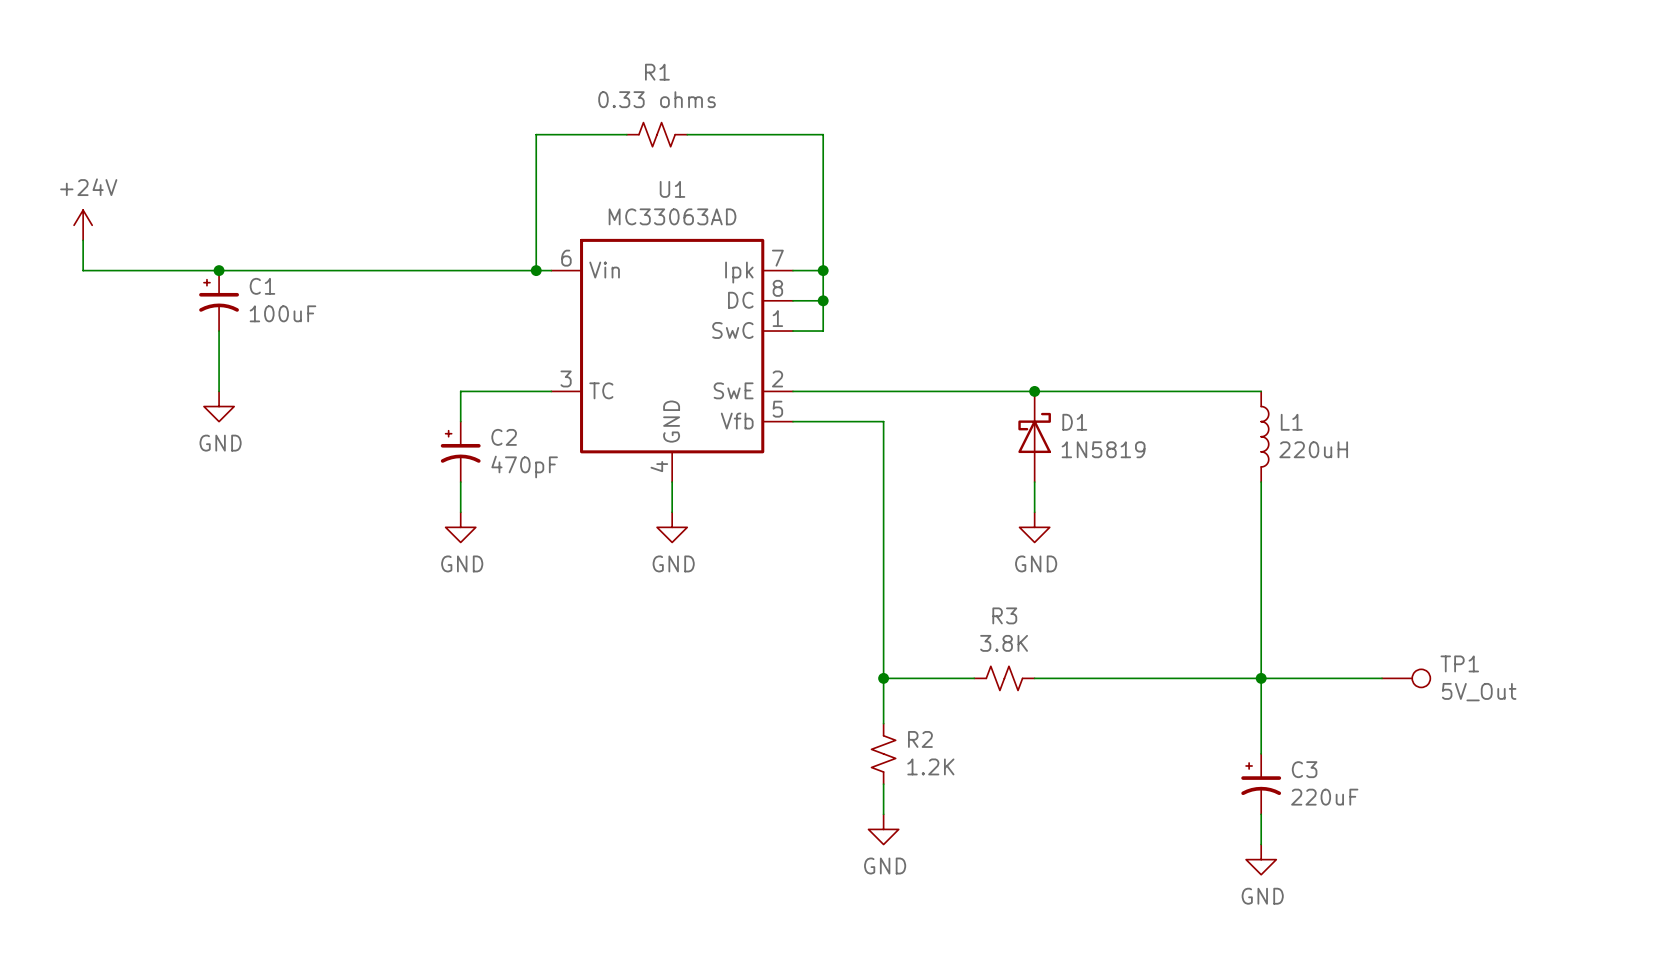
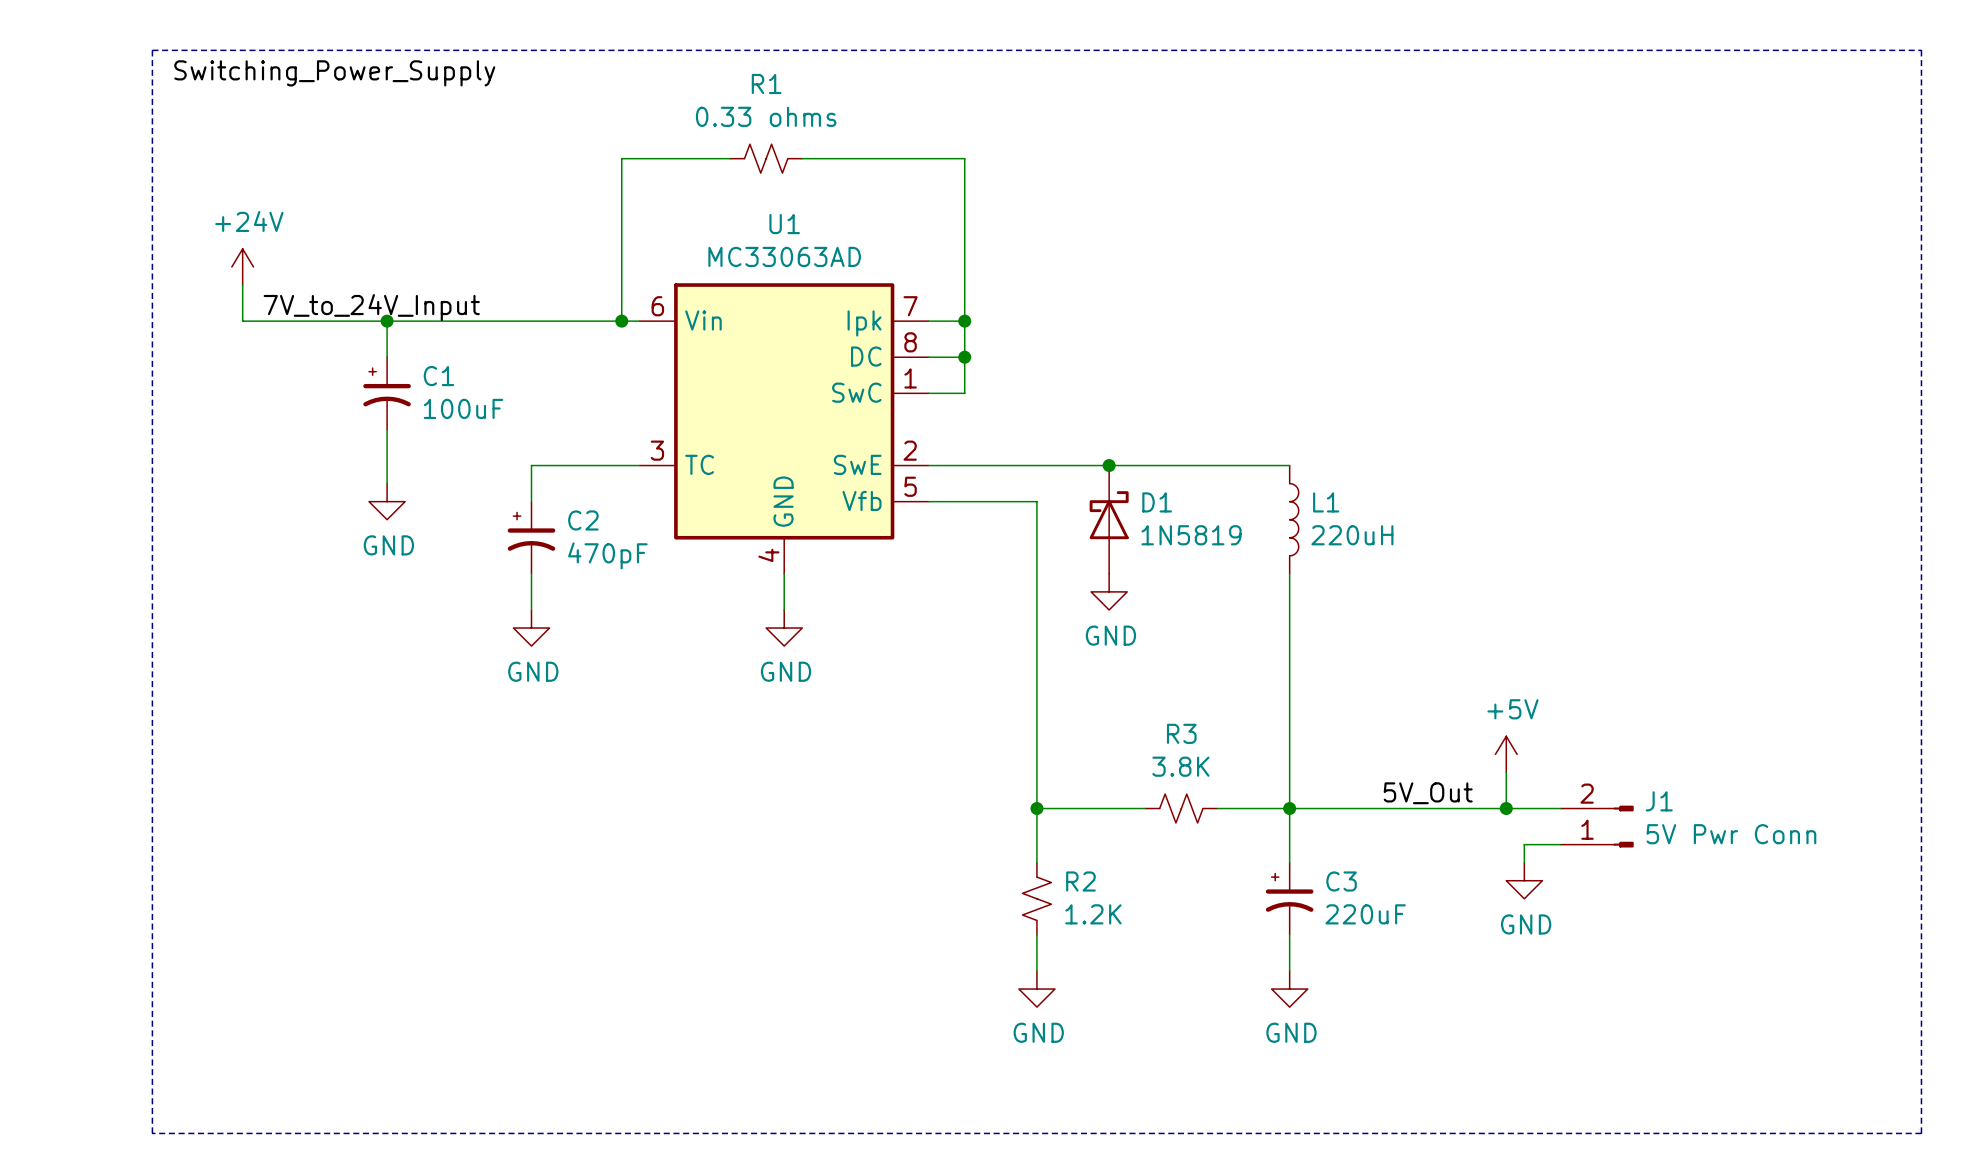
line: none -> (152, 50) (1921, 50) (1921, 1133) (152, 1133) (152, 50)
label: none -> Switching_Power_Supply (334, 73)
power symbol position: +24V (83, 225) -> +24V (242, 266)
wire: (83, 240) (83, 270) (219, 270) -> (242, 285) (242, 321)
label: none -> 7V_to_24V_Input (371, 307)
junction: (219, 270) -> none
wire: none -> (387, 321) (387, 357)
junction: none -> (387, 321)
C1 position: (219, 300) -> (387, 393)
wire: (219, 331) (219, 391) -> none
wire: none -> (387, 429) (387, 483)
junction: none -> (1109, 465)
junction: (1034, 391) -> none
wire: (1095, 391) (1261, 391) -> none
power symbol position: GND (219, 406) -> GND (387, 501)
D1 position: (1034, 436) -> (1109, 519)
L1 position: (1264, 436) -> (1294, 519)
wire: (1034, 482) (1034, 512) -> none
wire: none -> (1289, 573) (1289, 862)
wire: (1261, 482) (1261, 753) -> none
power symbol position: GND (1034, 527) -> GND (1109, 591)
power symbol: none -> +5V (1506, 754)
label: none -> 5V_Out (1428, 793)
junction: none -> (1289, 808)
junction position: (1261, 678) -> (1506, 808)
TP1: 5V_Out (1406, 678) -> none
J1: none -> 5V Pwr Conn (1597, 826)
wire: none -> (1560, 844) (1524, 844) (1524, 862)
power symbol: none -> GND (1524, 880)
wire: none -> (1289, 934) (1289, 970)
C3 position: (1261, 784) -> (1289, 898)
wire: (1261, 814) (1261, 844) -> (1506, 772) (1506, 808)
power symbol: none -> GND (1289, 989)
power symbol: GND (1261, 859) -> none

